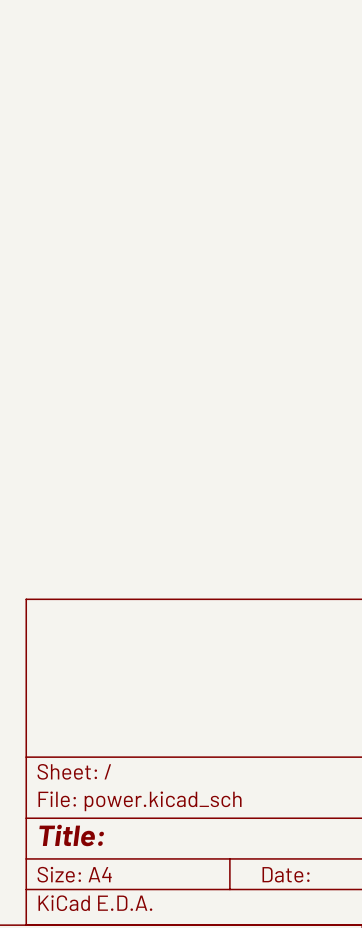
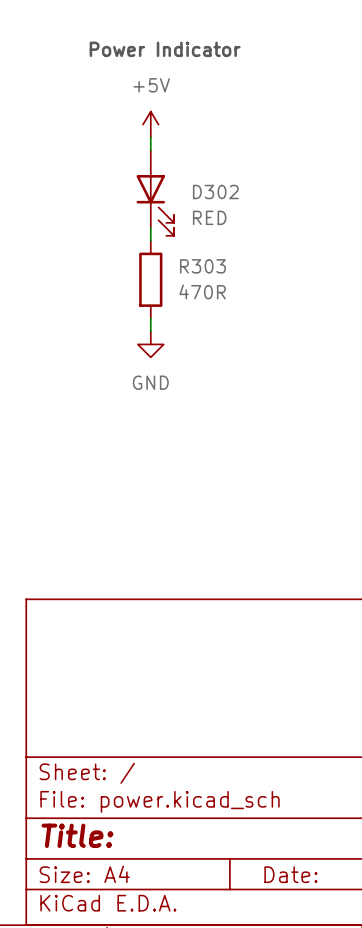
text: none -> Power Indicator (165, 49)
power symbol: none -> +5V (150, 124)
wire: none -> (150, 137) (150, 150)
D302: none -> RED (155, 193)
wire: none -> (150, 228) (150, 240)
R303: none -> 470R (150, 279)
wire: none -> (150, 318) (150, 331)
power symbol: none -> GND (150, 344)

